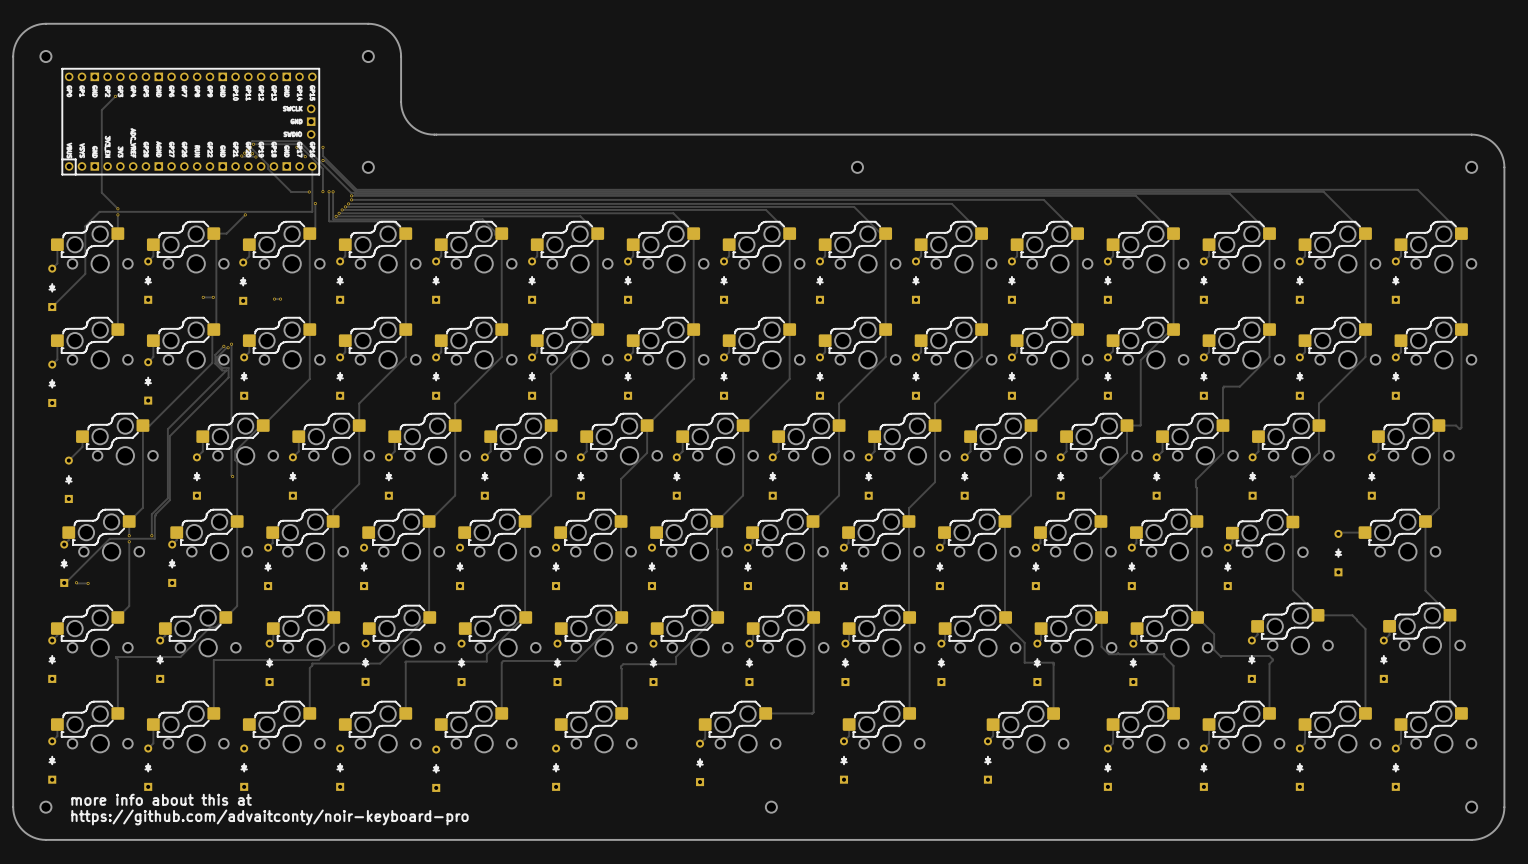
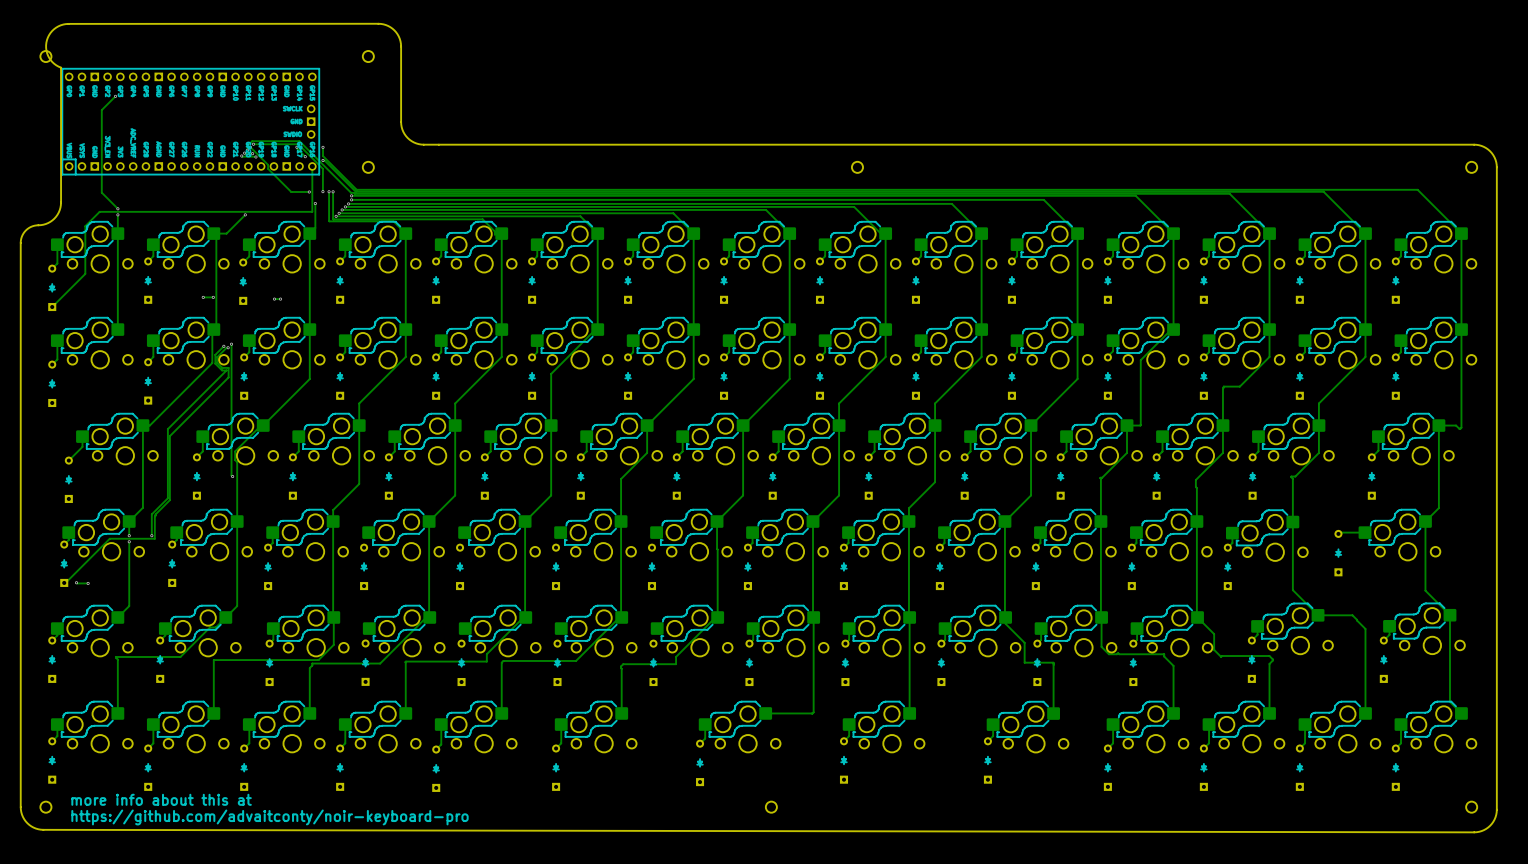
board edge: (401, 56) (398, 43) (391, 33) (380, 26) (368, 23) (42, 23) (27, 29) (17, 41) (13, 56) (13, 807) (17, 822) (27, 834) (45, 839) (1471, 839) (1487, 836) (1498, 825) (1504, 807) (1504, 167) (1500, 151) (1489, 140) (1471, 134) (431, 134) (418, 130) (408, 122) (403, 114) (401, 101) -> (401, 56) (400, 43) (397, 34) (390, 27) (378, 23) (68, 23) (56, 27) (47, 37) (46, 47) (47, 55) (54, 63) (61, 67) (60, 205) (57, 214) (52, 220) (45, 224) (32, 226) (25, 230) (20, 242) (20, 807) (22, 817) (31, 826) (43, 829) (1474, 832) (1486, 828) (1493, 821) (1496, 809) (1496, 167) (1494, 157) (1486, 148) (1474, 144) (423, 144) (411, 141) (403, 131) (401, 124) (401, 101)
track: none -> (249, 724) (249, 743) (244, 748)
track: none -> (345, 724) (345, 743) (340, 748)
track: none -> (441, 724) (441, 744) (436, 749)
track: none -> (561, 724) (561, 743) (556, 748)

